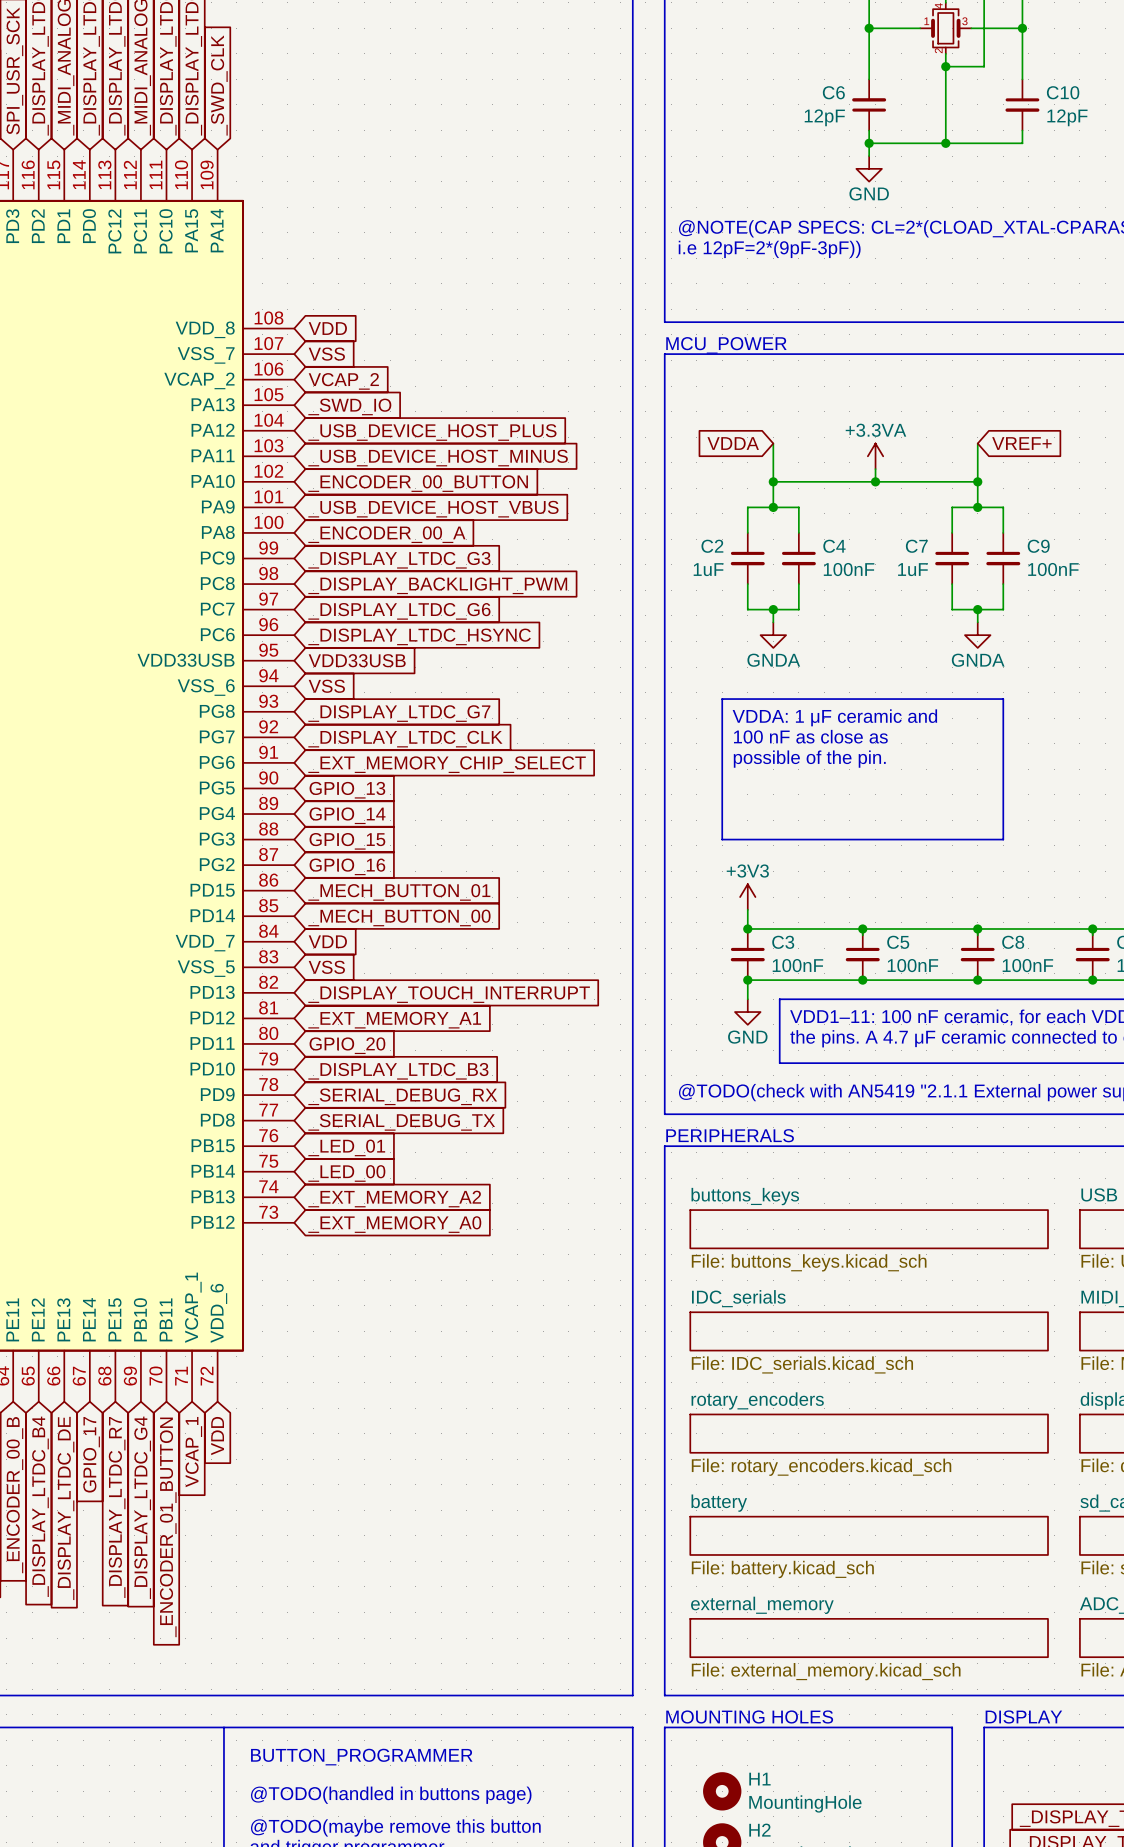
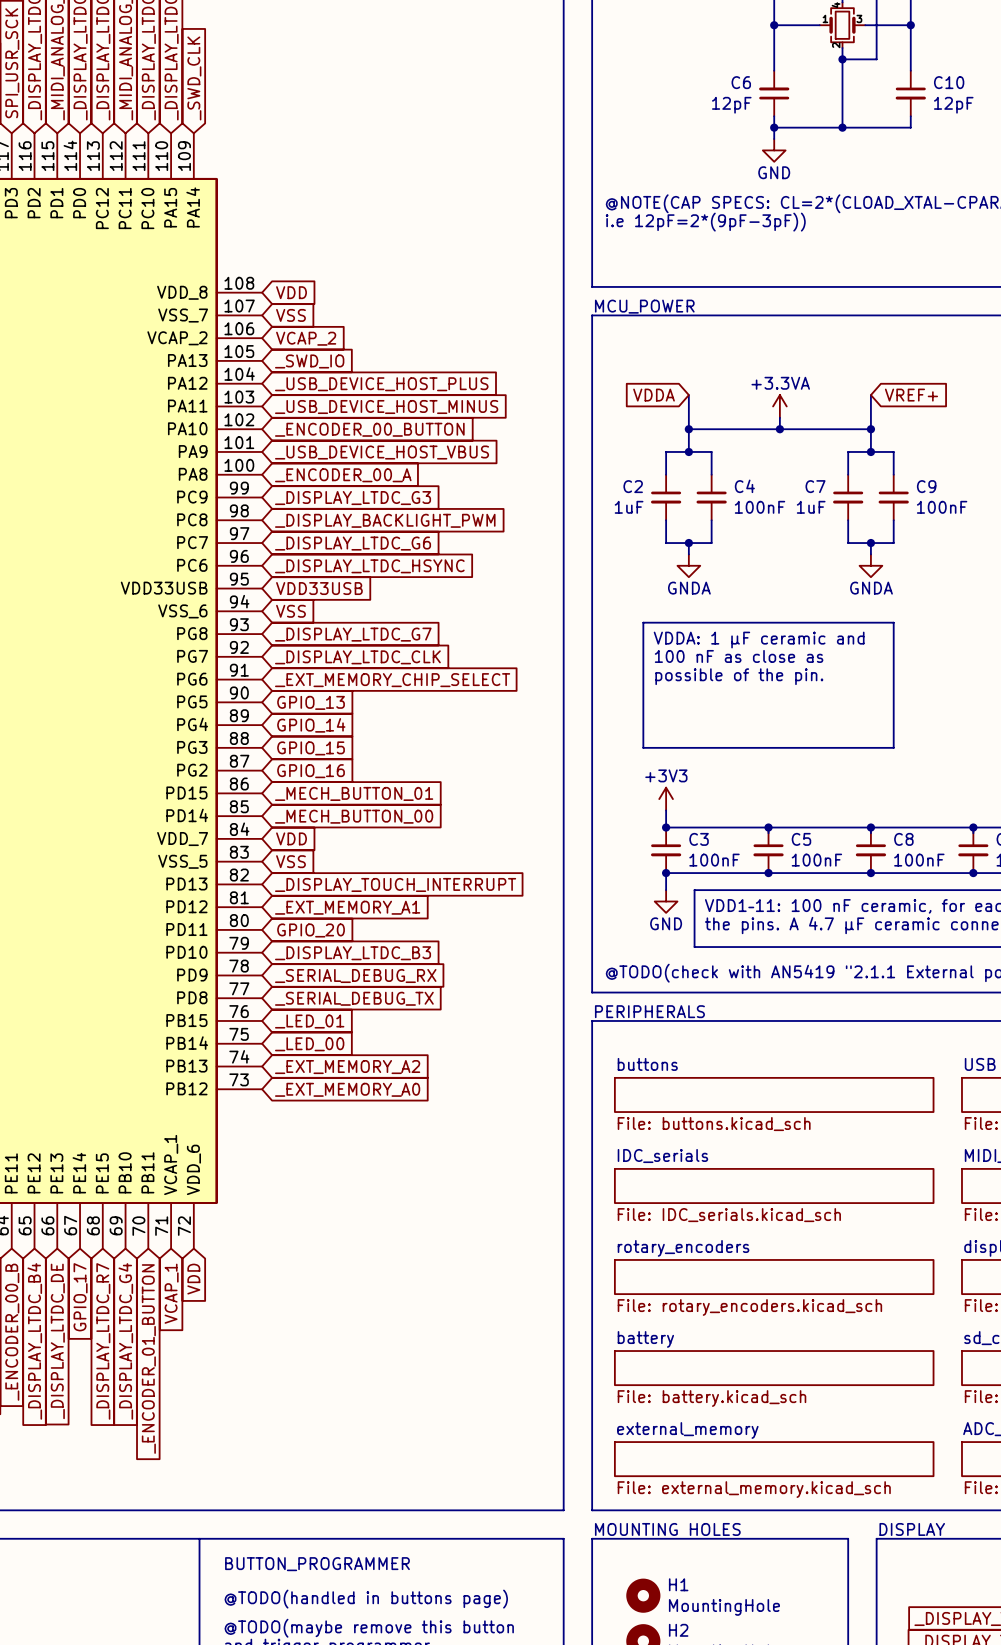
sheet buttons_keys name: buttons_keys (745, 1196) -> buttons (647, 1064)
sheet buttons_keys value: File: buttons_keys.kicad_sch (809, 1262) -> File: buttons.kicad_sch (714, 1124)

